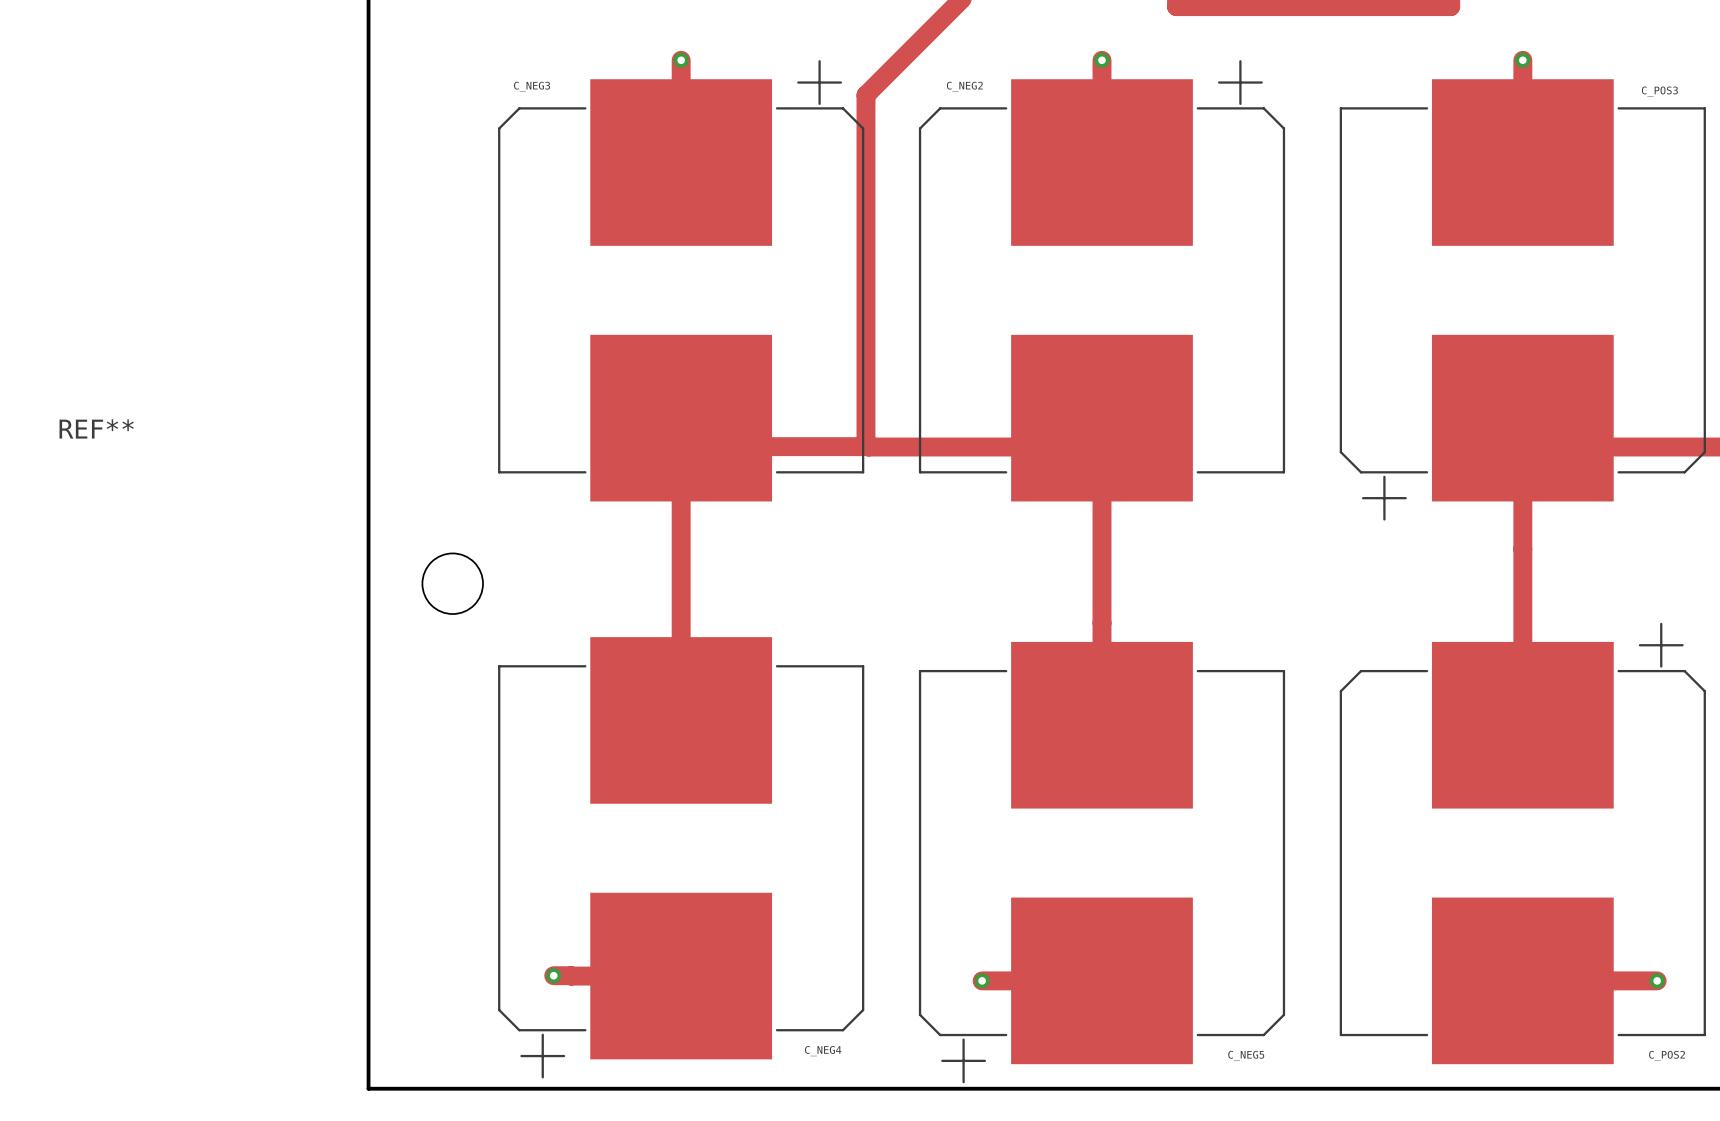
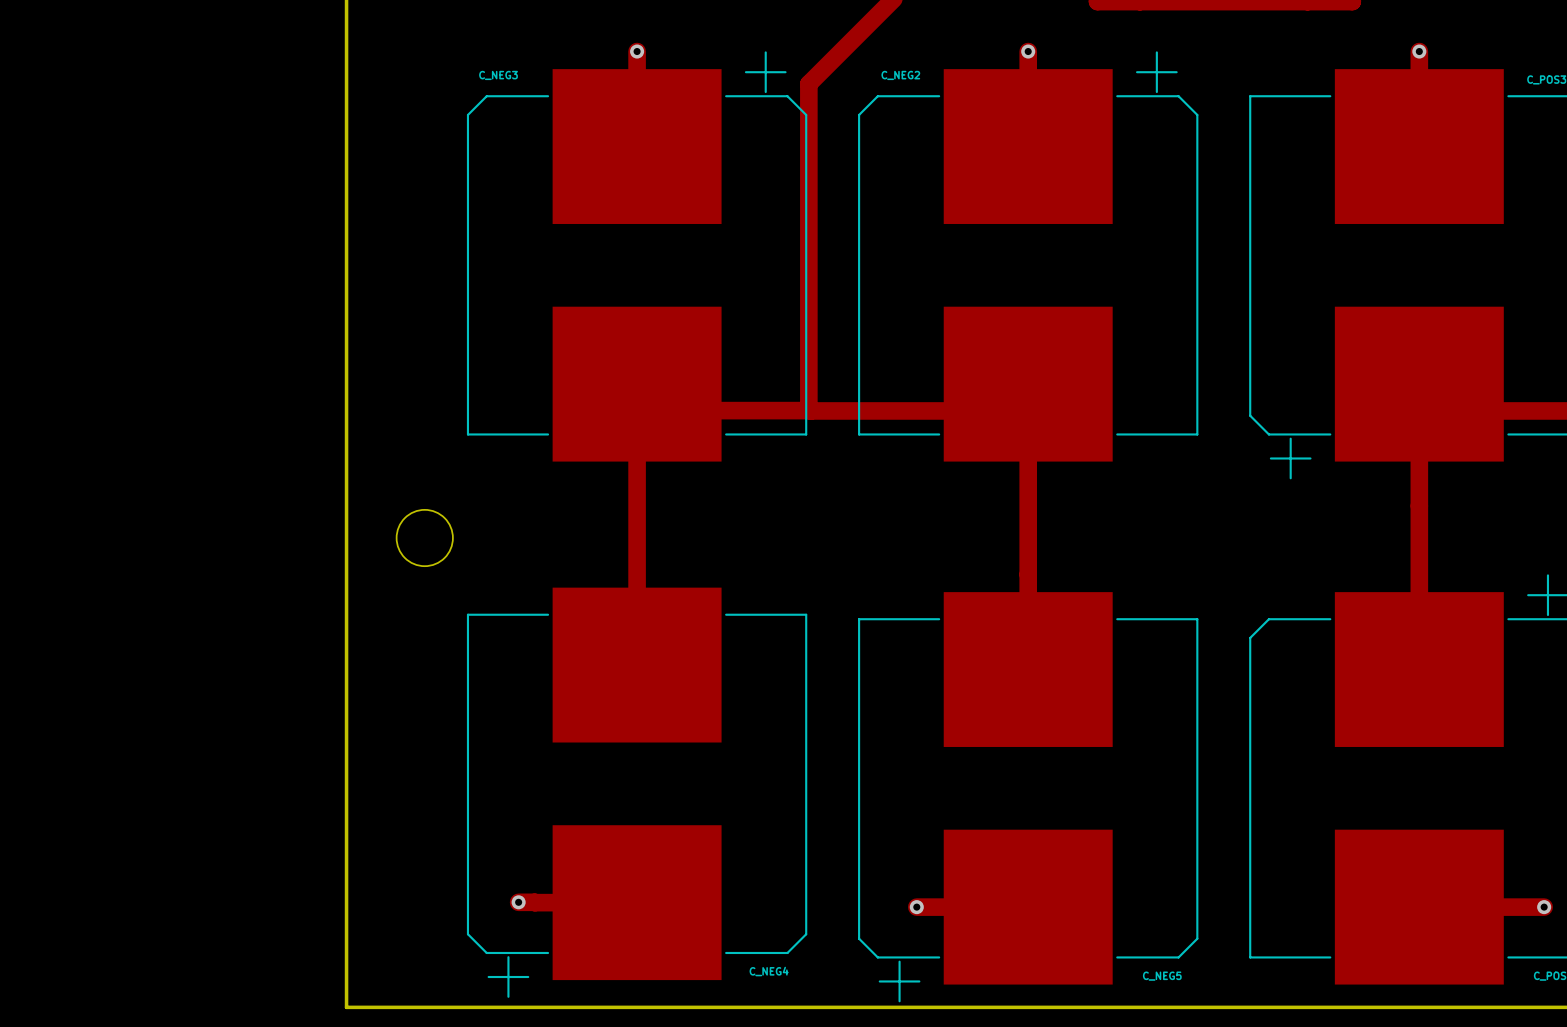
REF** name: REF** (96, 428) -> none

